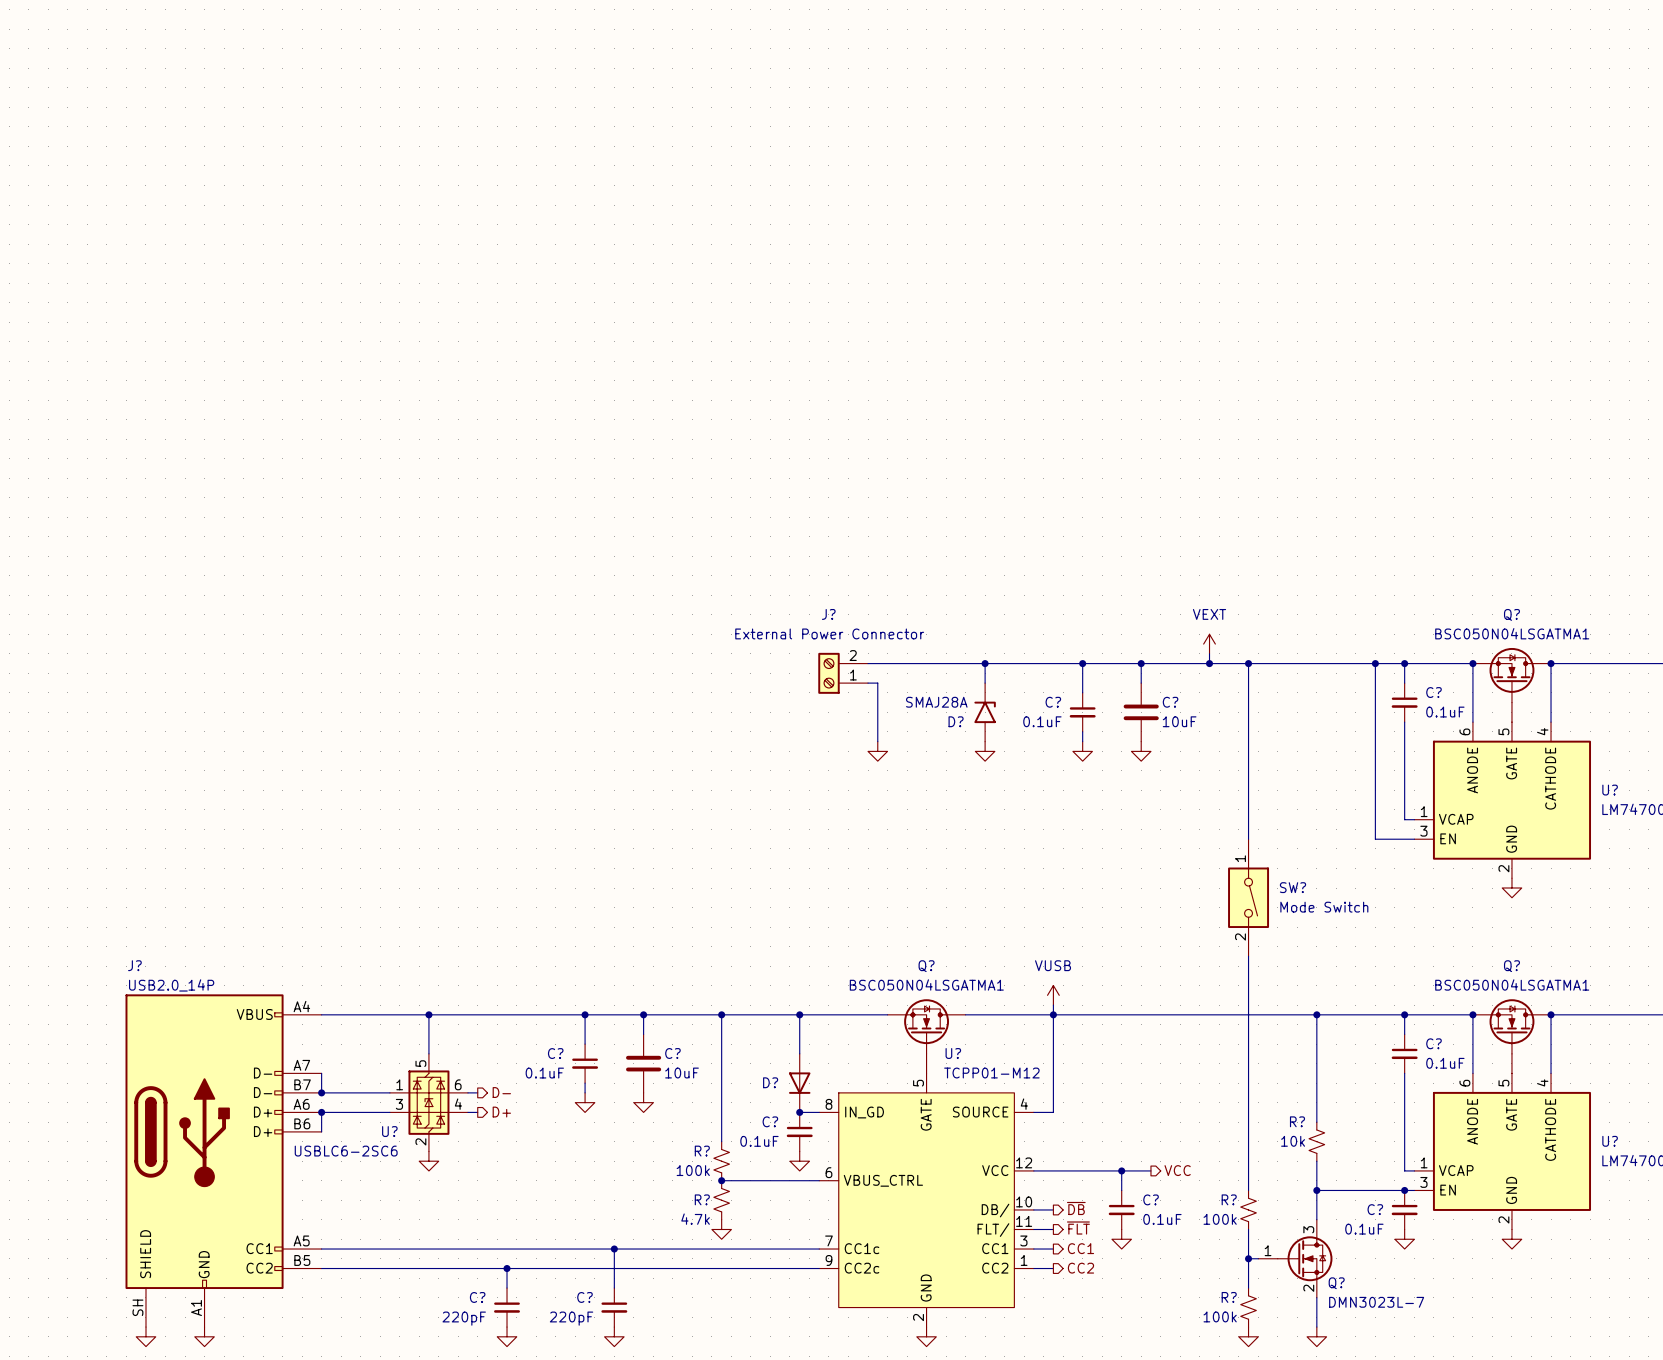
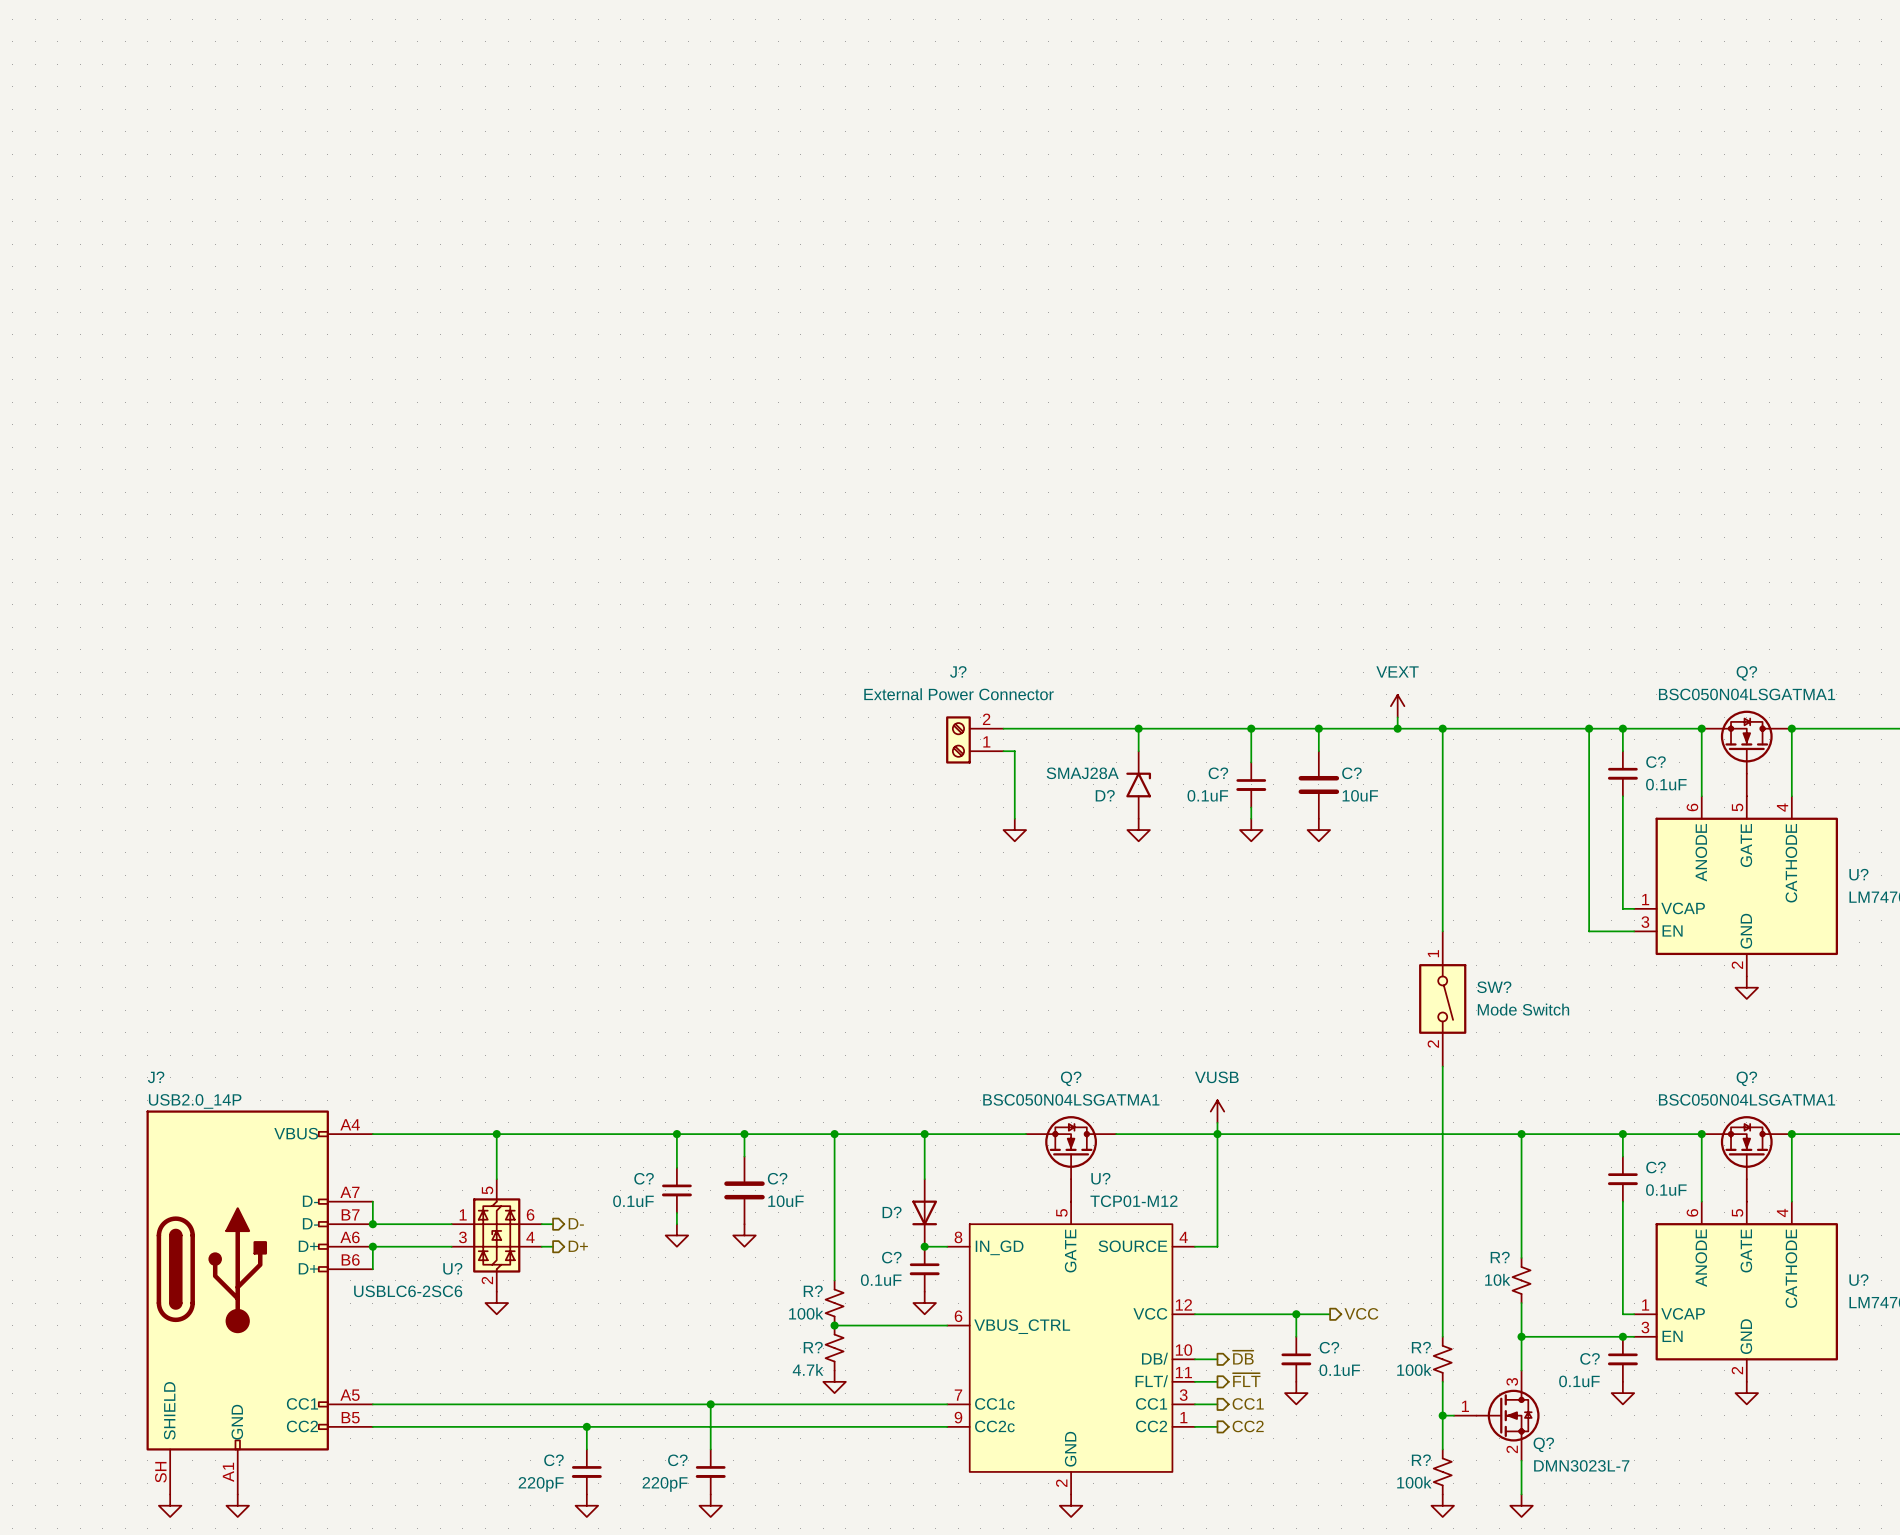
U? value: TCPP01-M12 (991, 1073) -> TCP01-M12 (1133, 1201)

